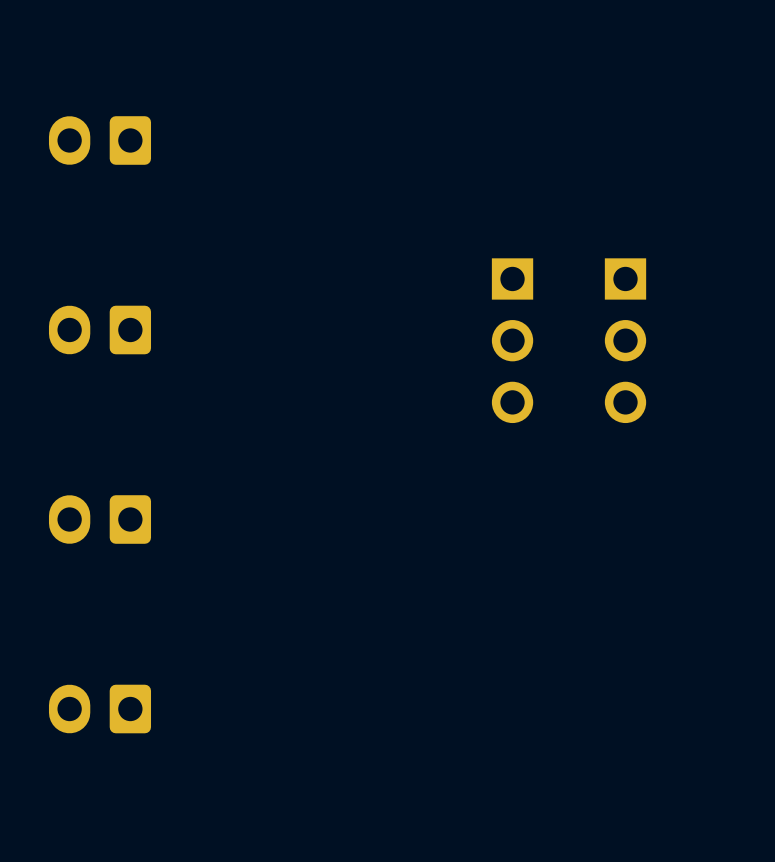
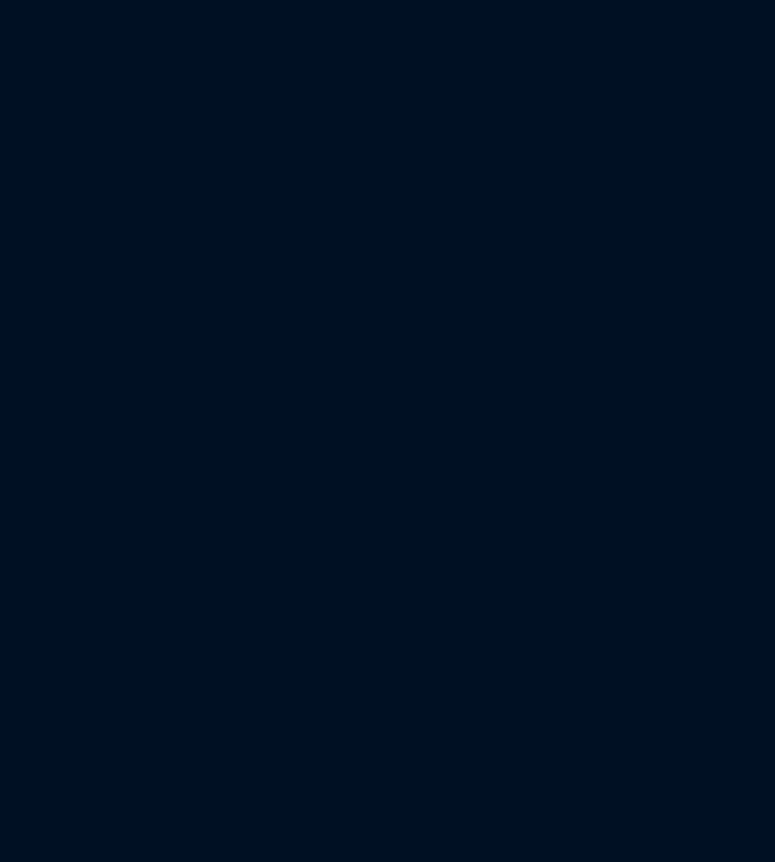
part: (99, 140) -> none
part: (99, 330) -> none
part: (512, 340) -> none
part: (625, 340) -> none
part: (99, 519) -> none
part: (99, 709) -> none

